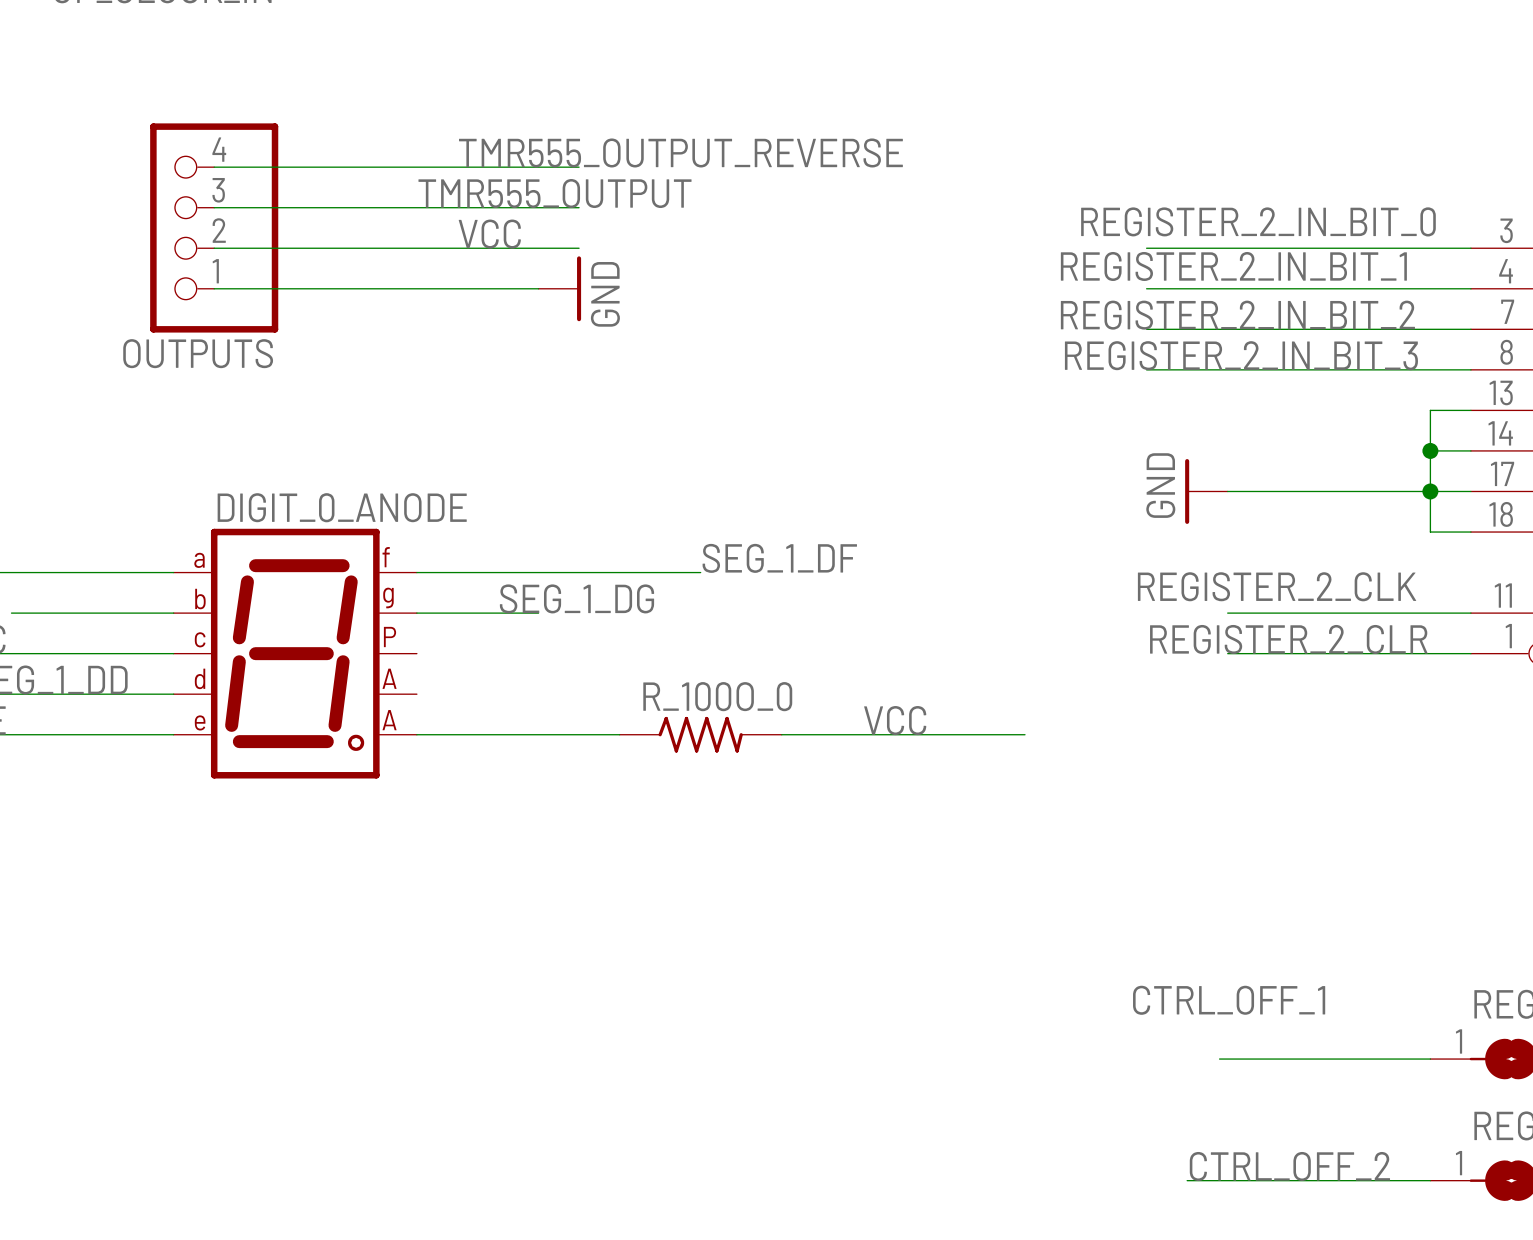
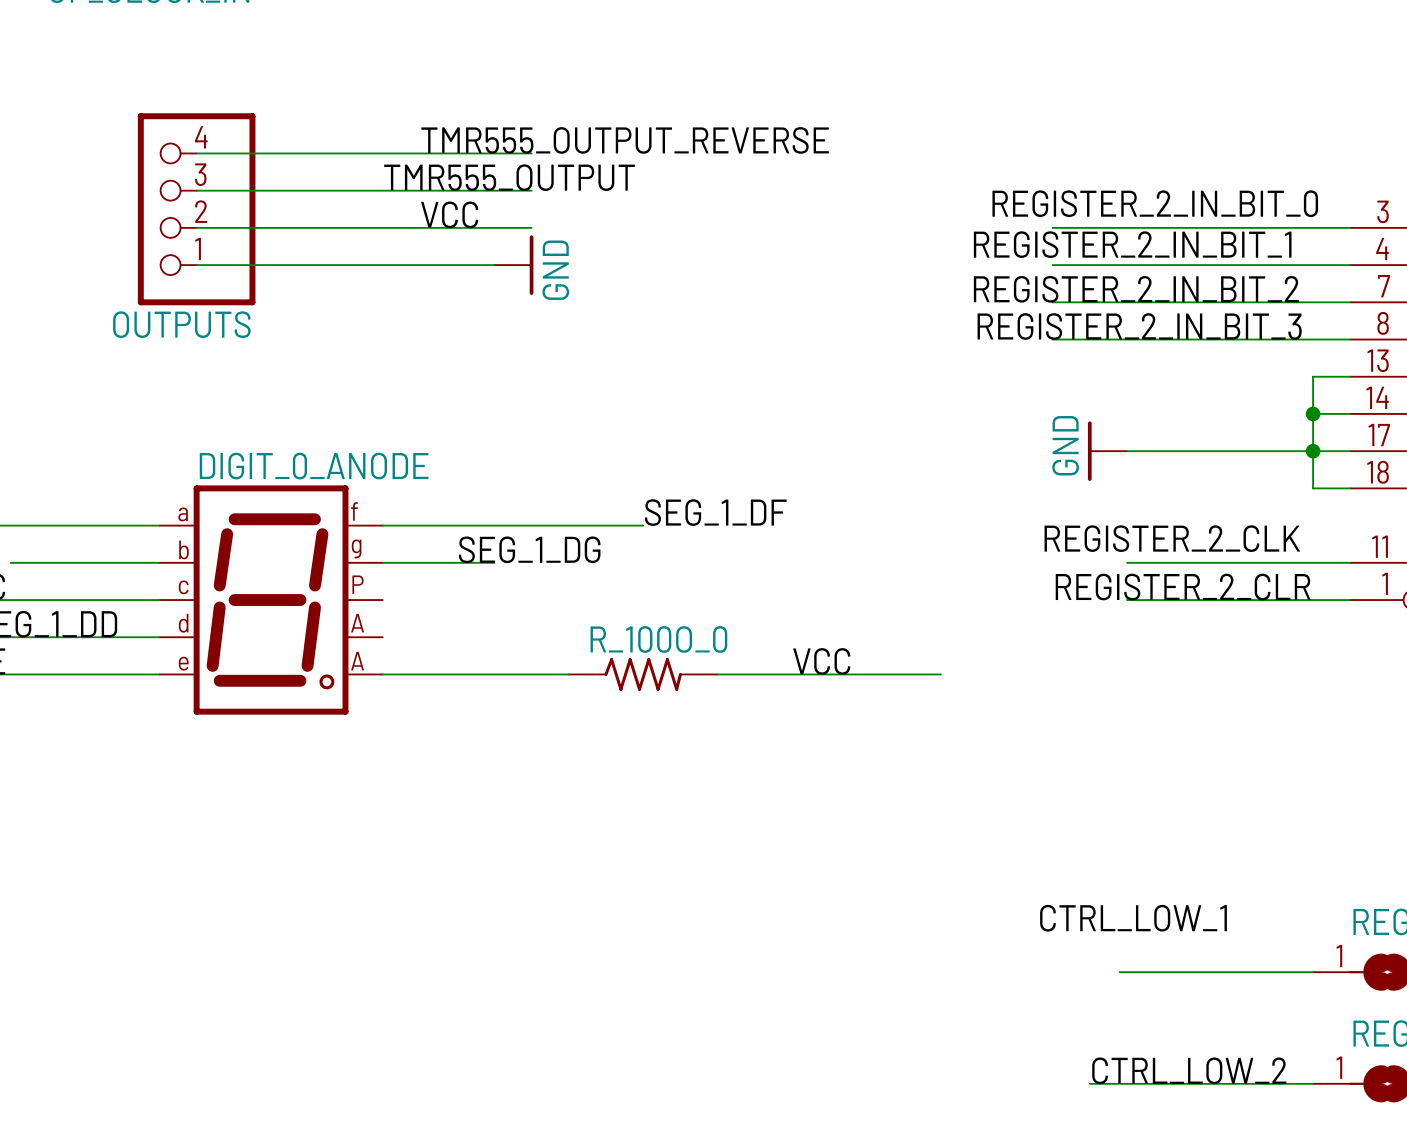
label: CTRL_OFF_1 (1229, 1000) -> CTRL_LOW_1 (1133, 918)
label: CTRL_OFF_2 (1289, 1166) -> CTRL_LOW_2 (1189, 1070)

